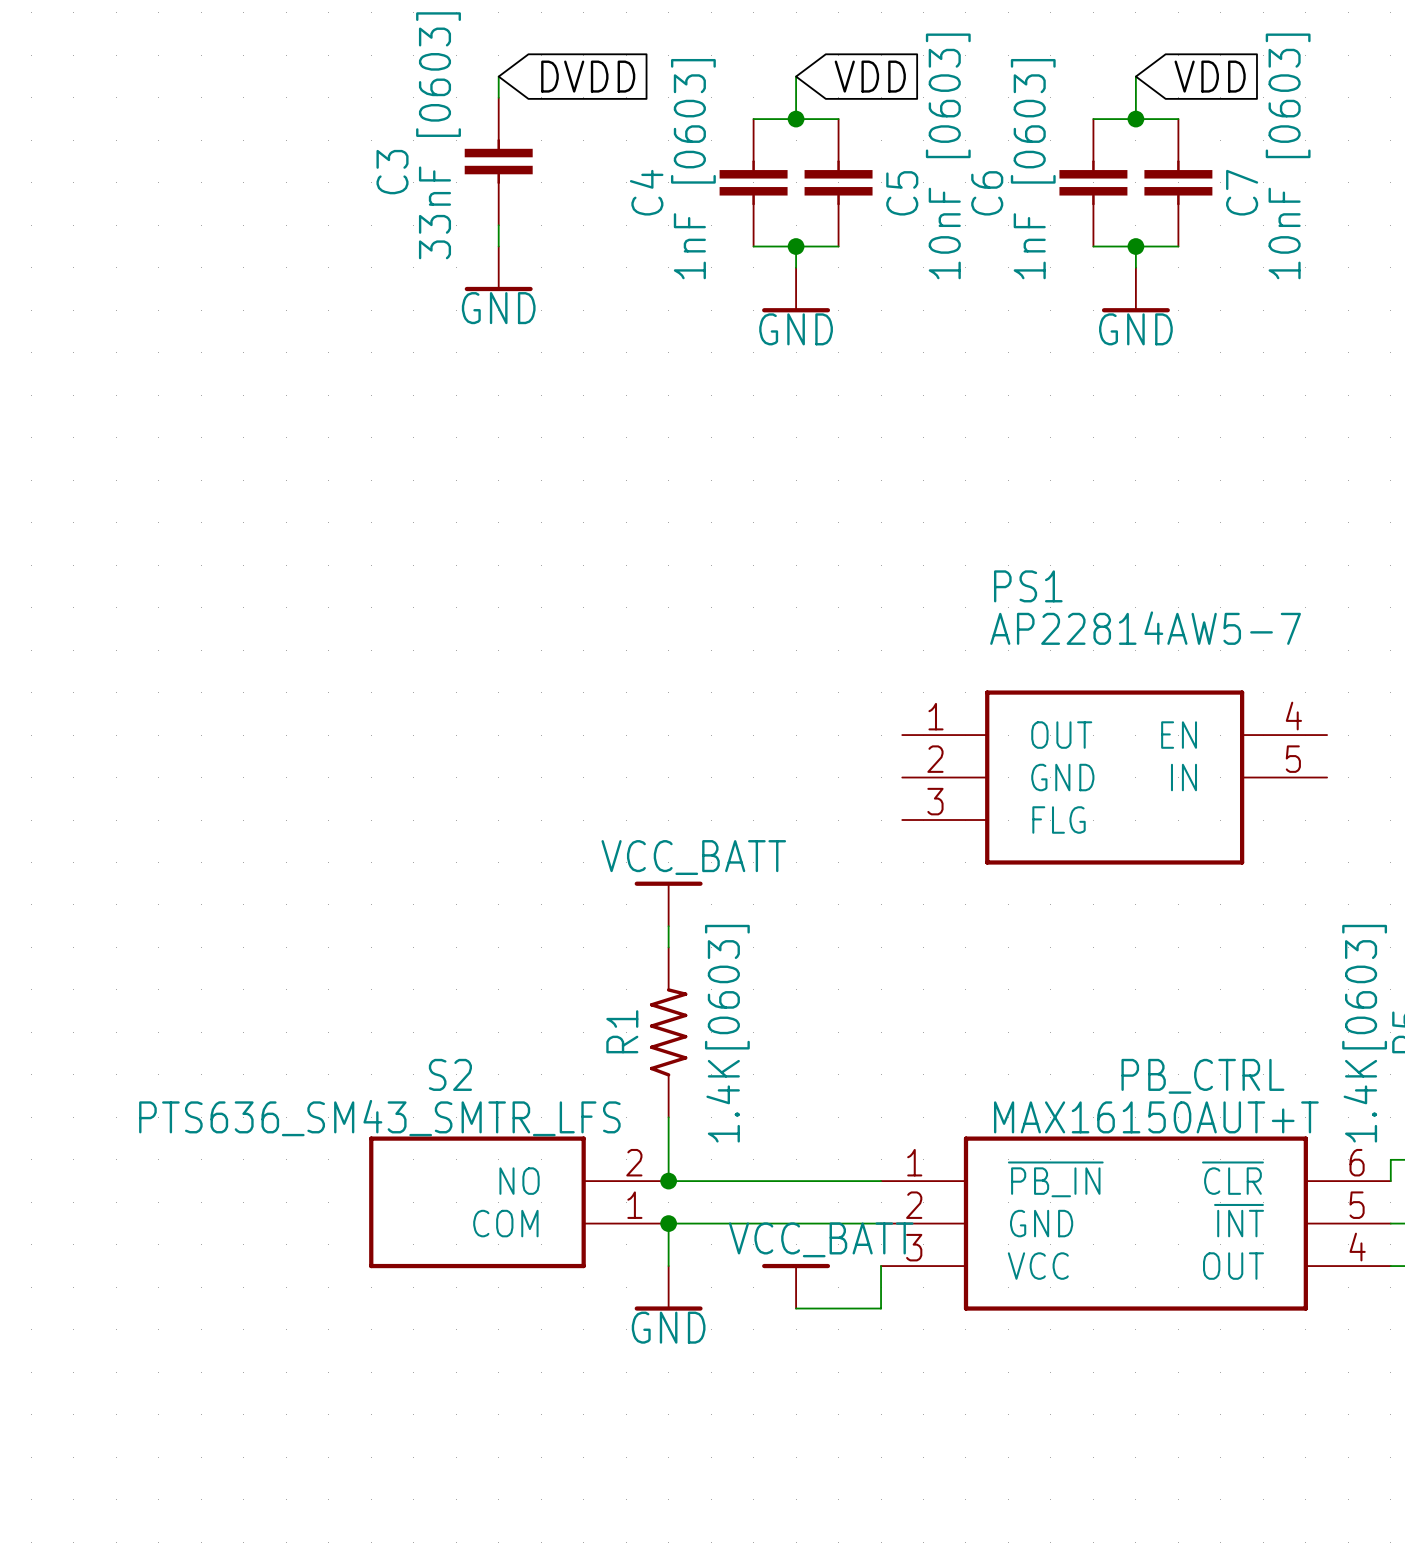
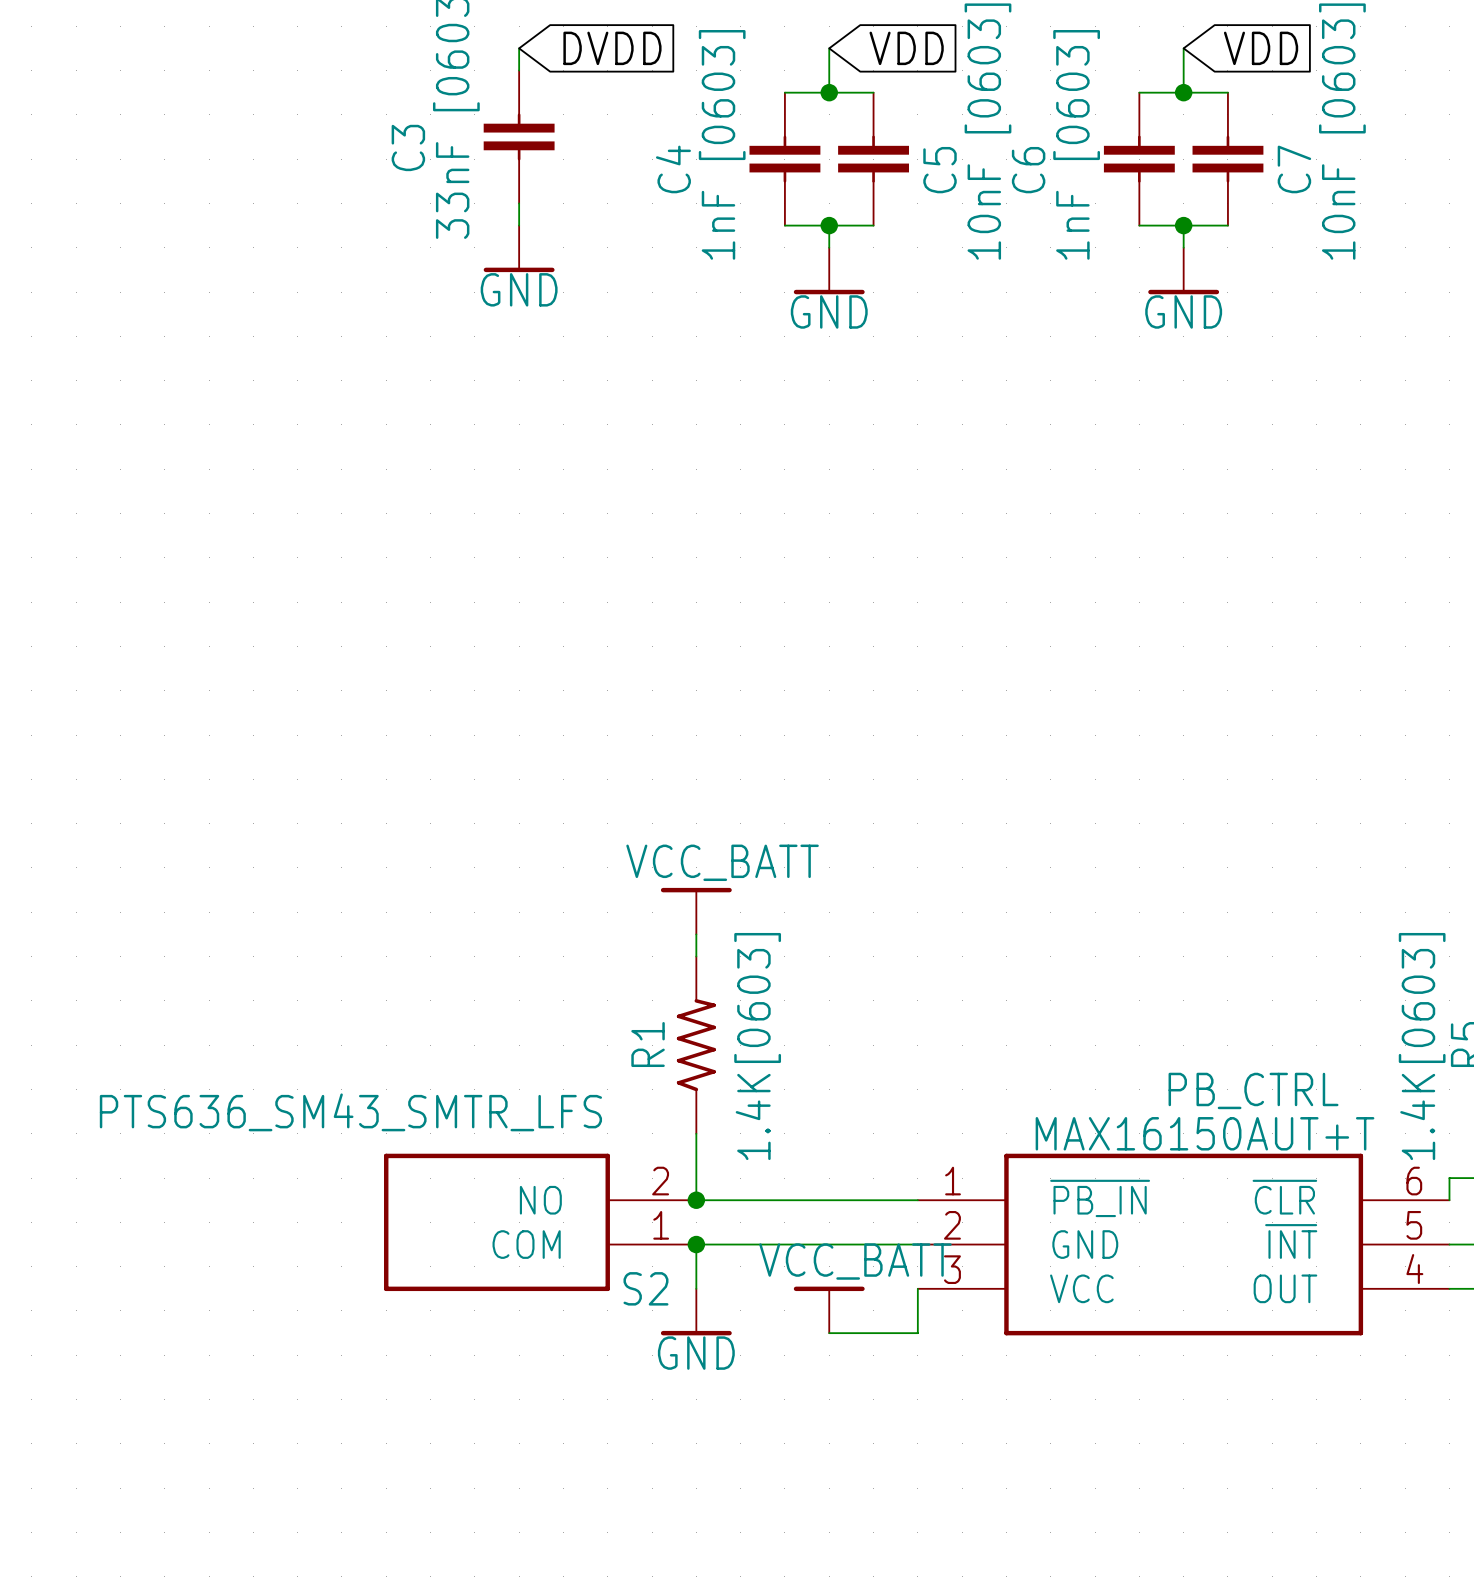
PS1: AP22814AW5-7 (1114, 777) -> none
S2 name position: S2 (450, 1074) -> S2 (645, 1288)
S2 value position: PTS636_SM43_SMTR_LFS (379, 1118) -> PTS636_SM43_SMTR_LFS (350, 1112)

